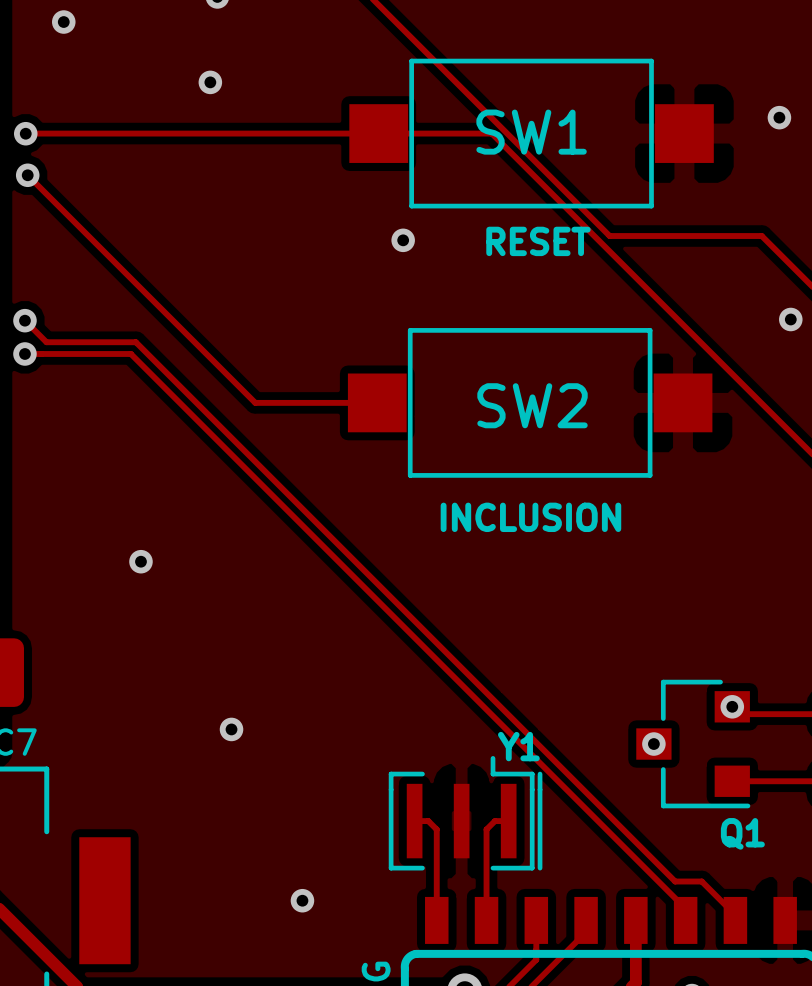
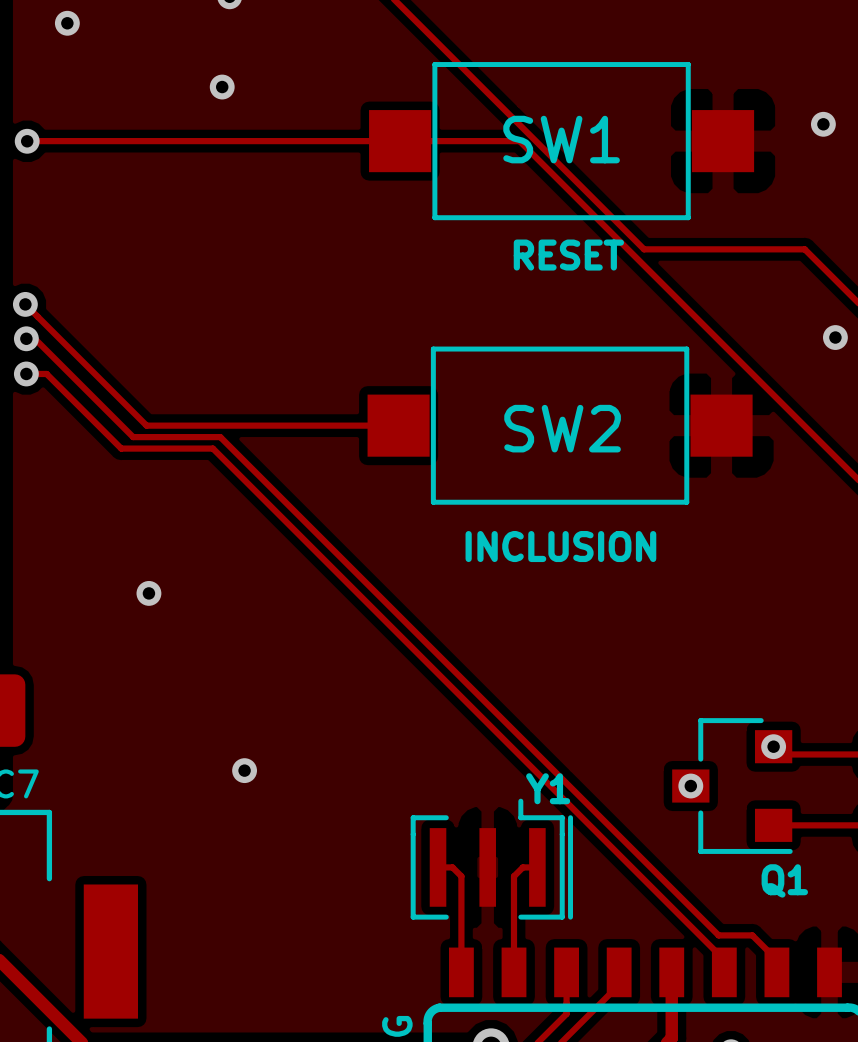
track: (27, 175) (255, 402) -> (25, 304) (146, 425) (269, 425)
via: (27, 175) -> none
via: (403, 240) -> none
via: none -> (25, 304)
track: (24, 320) (46, 342) (135, 342) (675, 881) (701, 881) (735, 915) -> (26, 339) (35, 339) (133, 437) (220, 437) (718, 935) (752, 935) (776, 959) (776, 966)
track: (44, 353) (130, 353) (201, 424) -> (46, 373) (121, 448) (212, 448)
via: (302, 900) -> none

